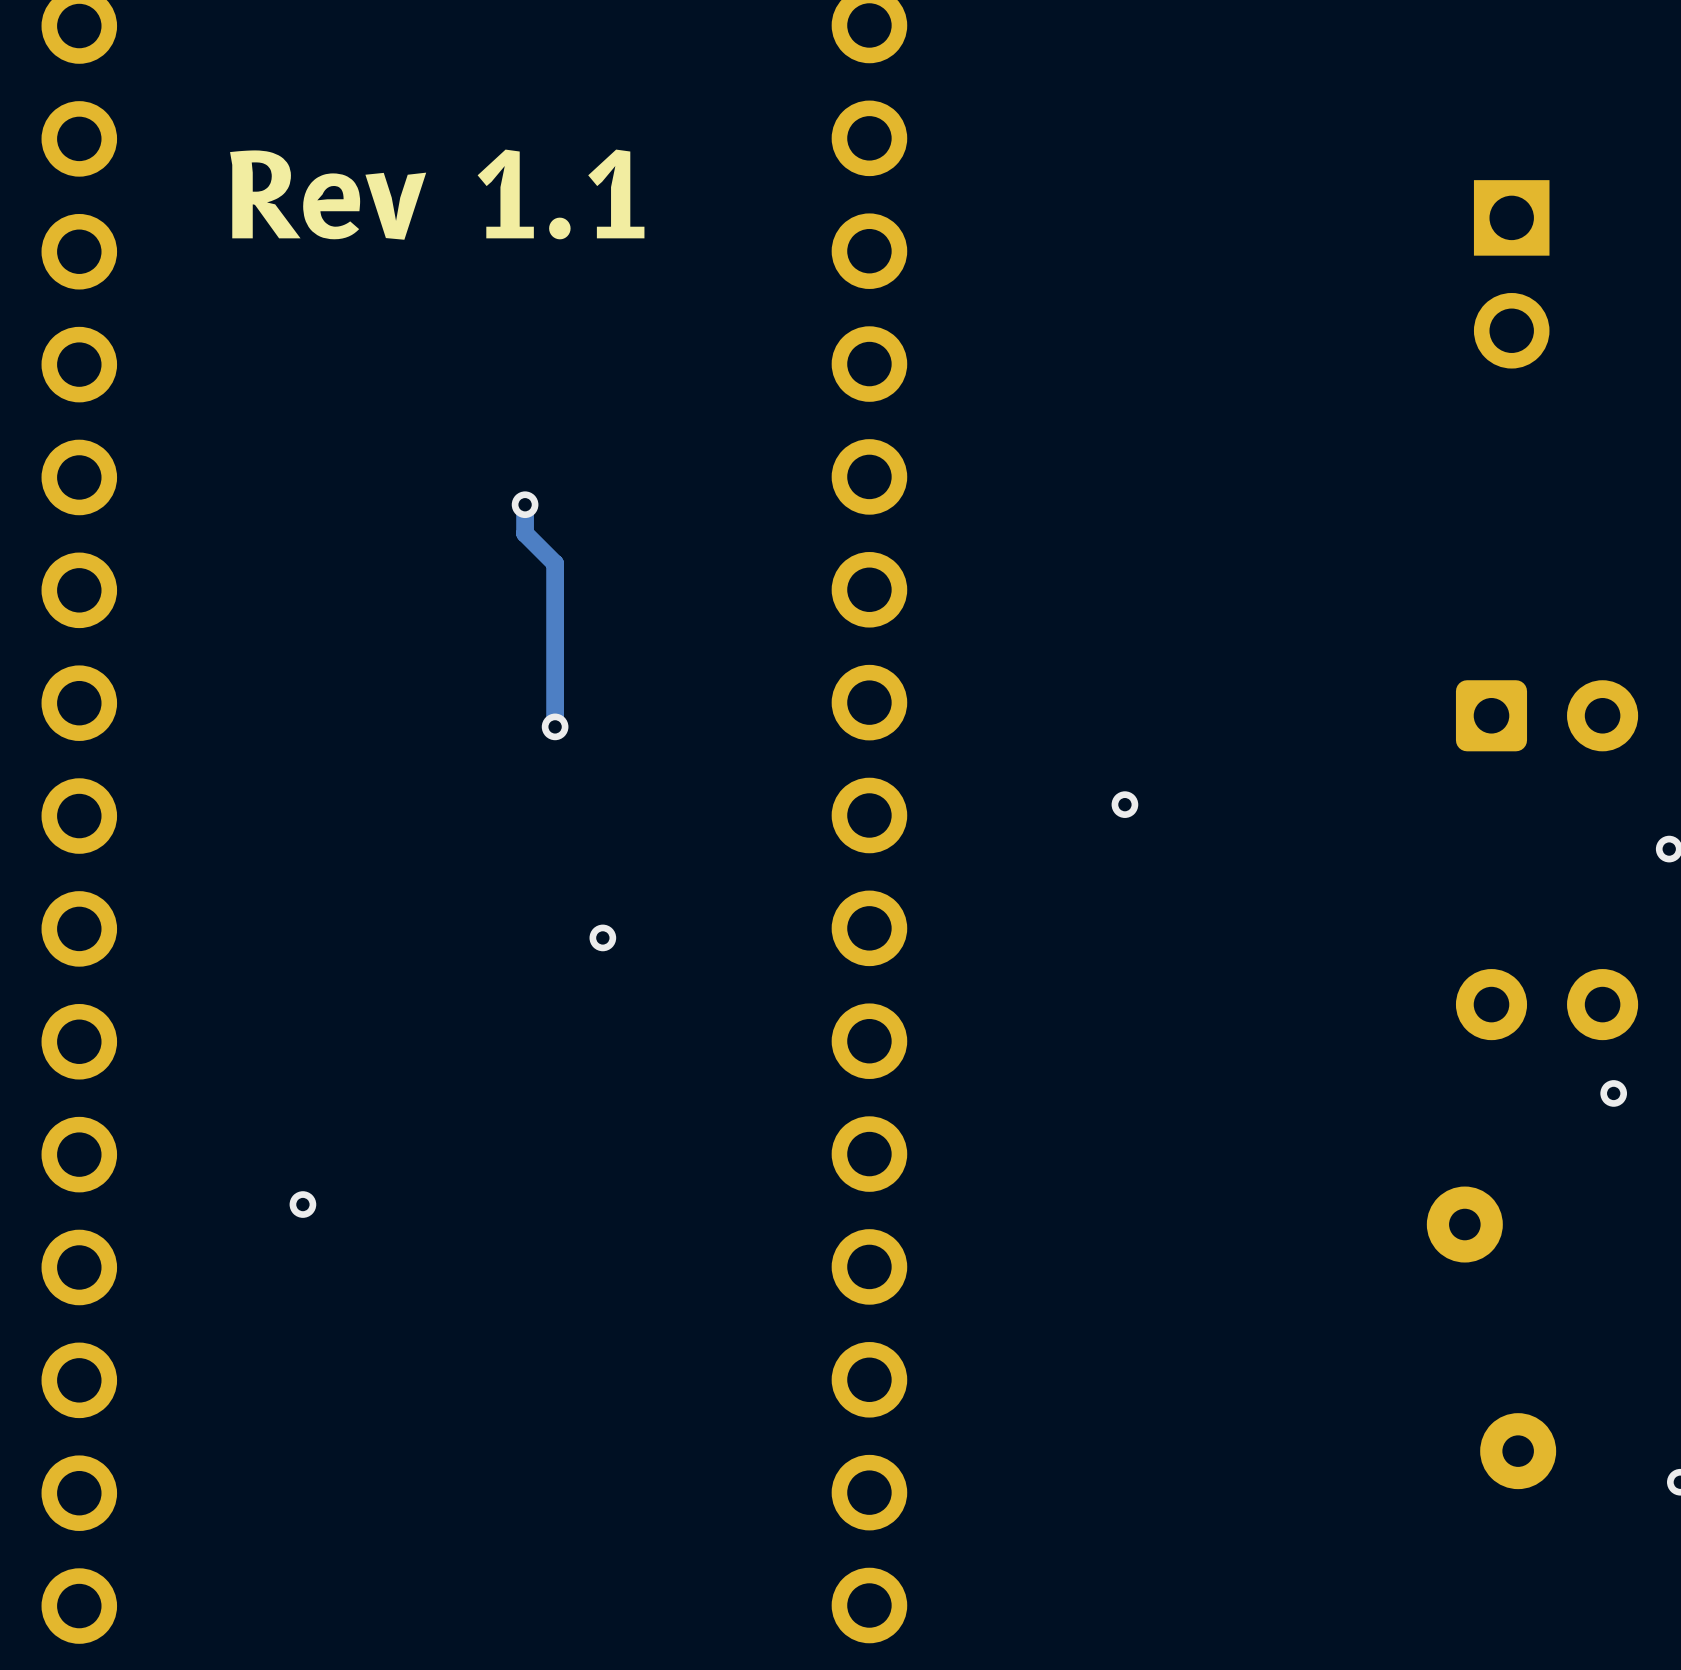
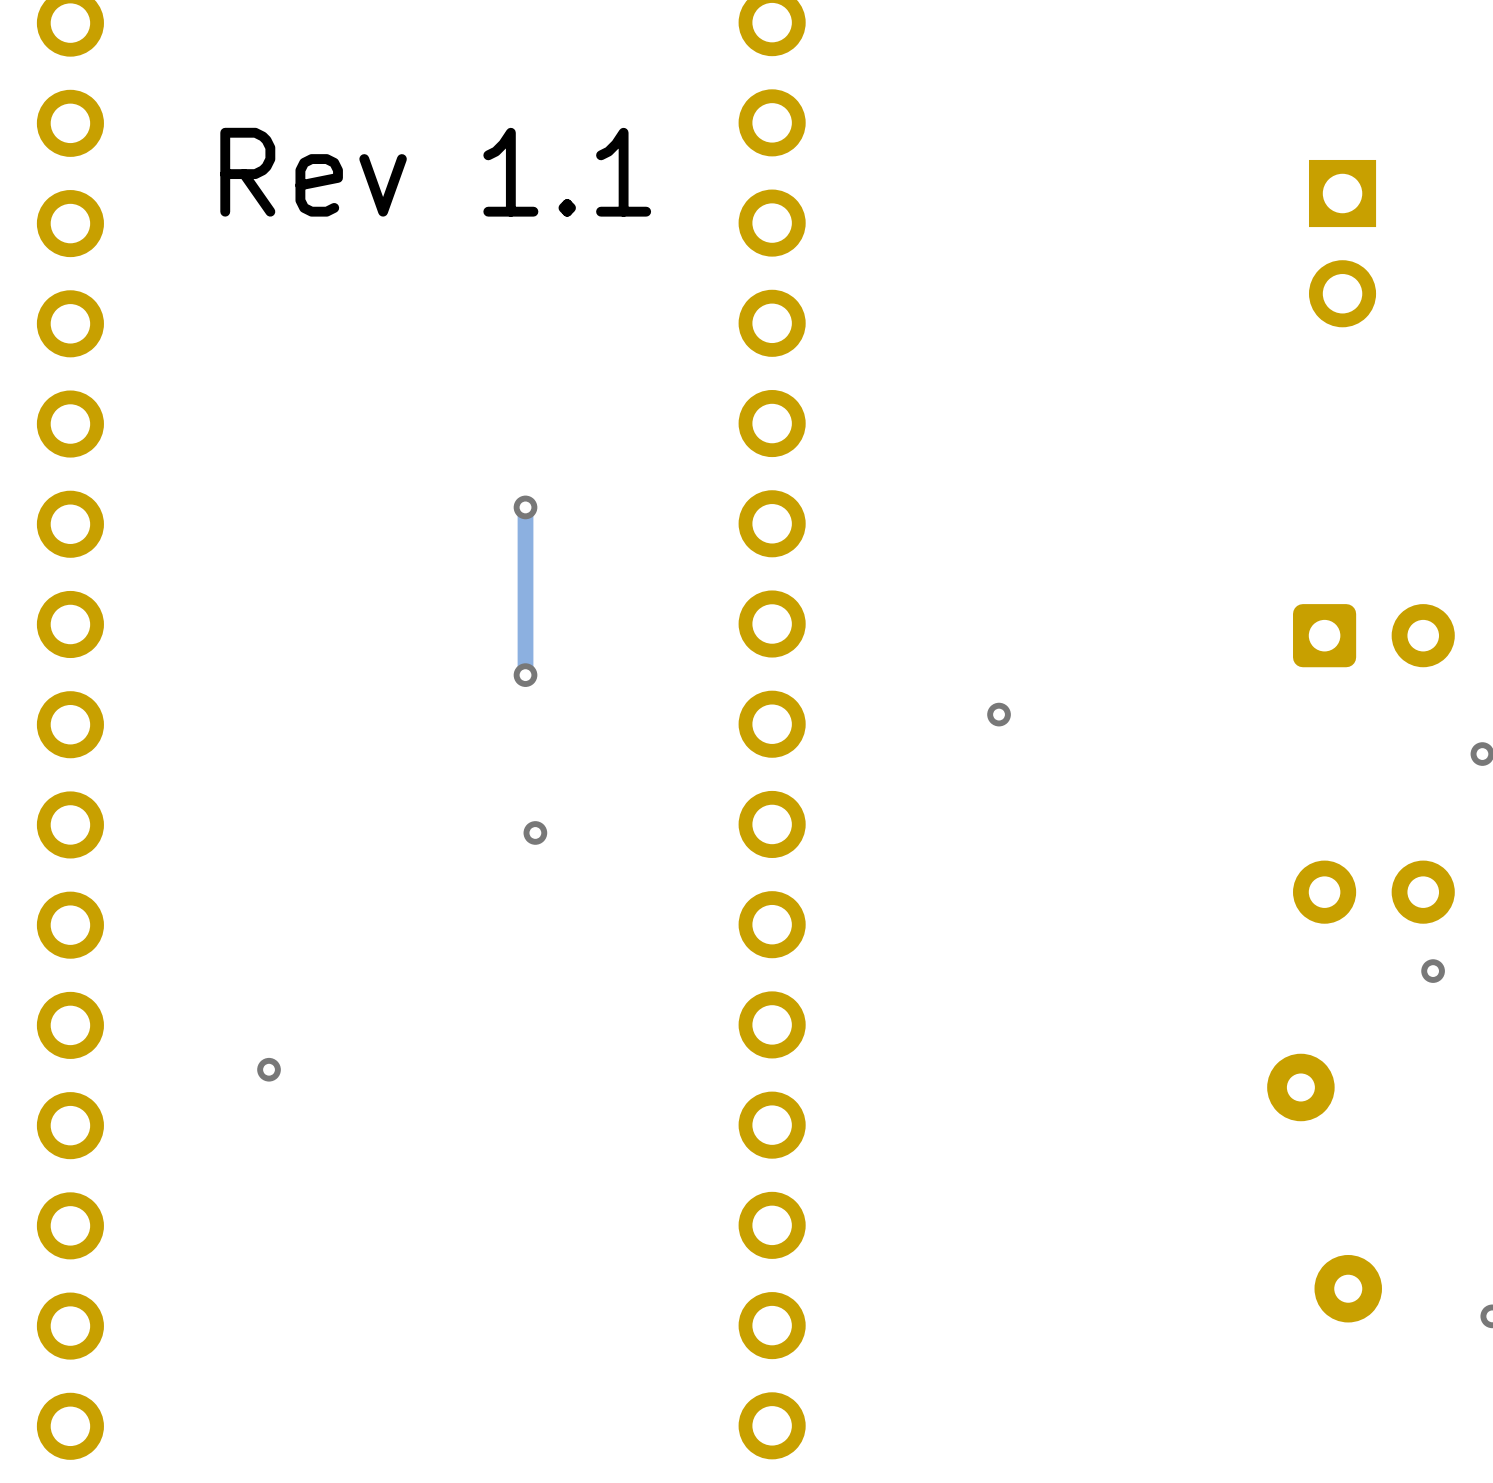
track: (525, 504) (525, 533) (555, 563) (555, 726) -> none
via: (525, 504) -> none
track: none -> (525, 507) (525, 675)
via: none -> (525, 507)
via position: (555, 726) -> (525, 675)

